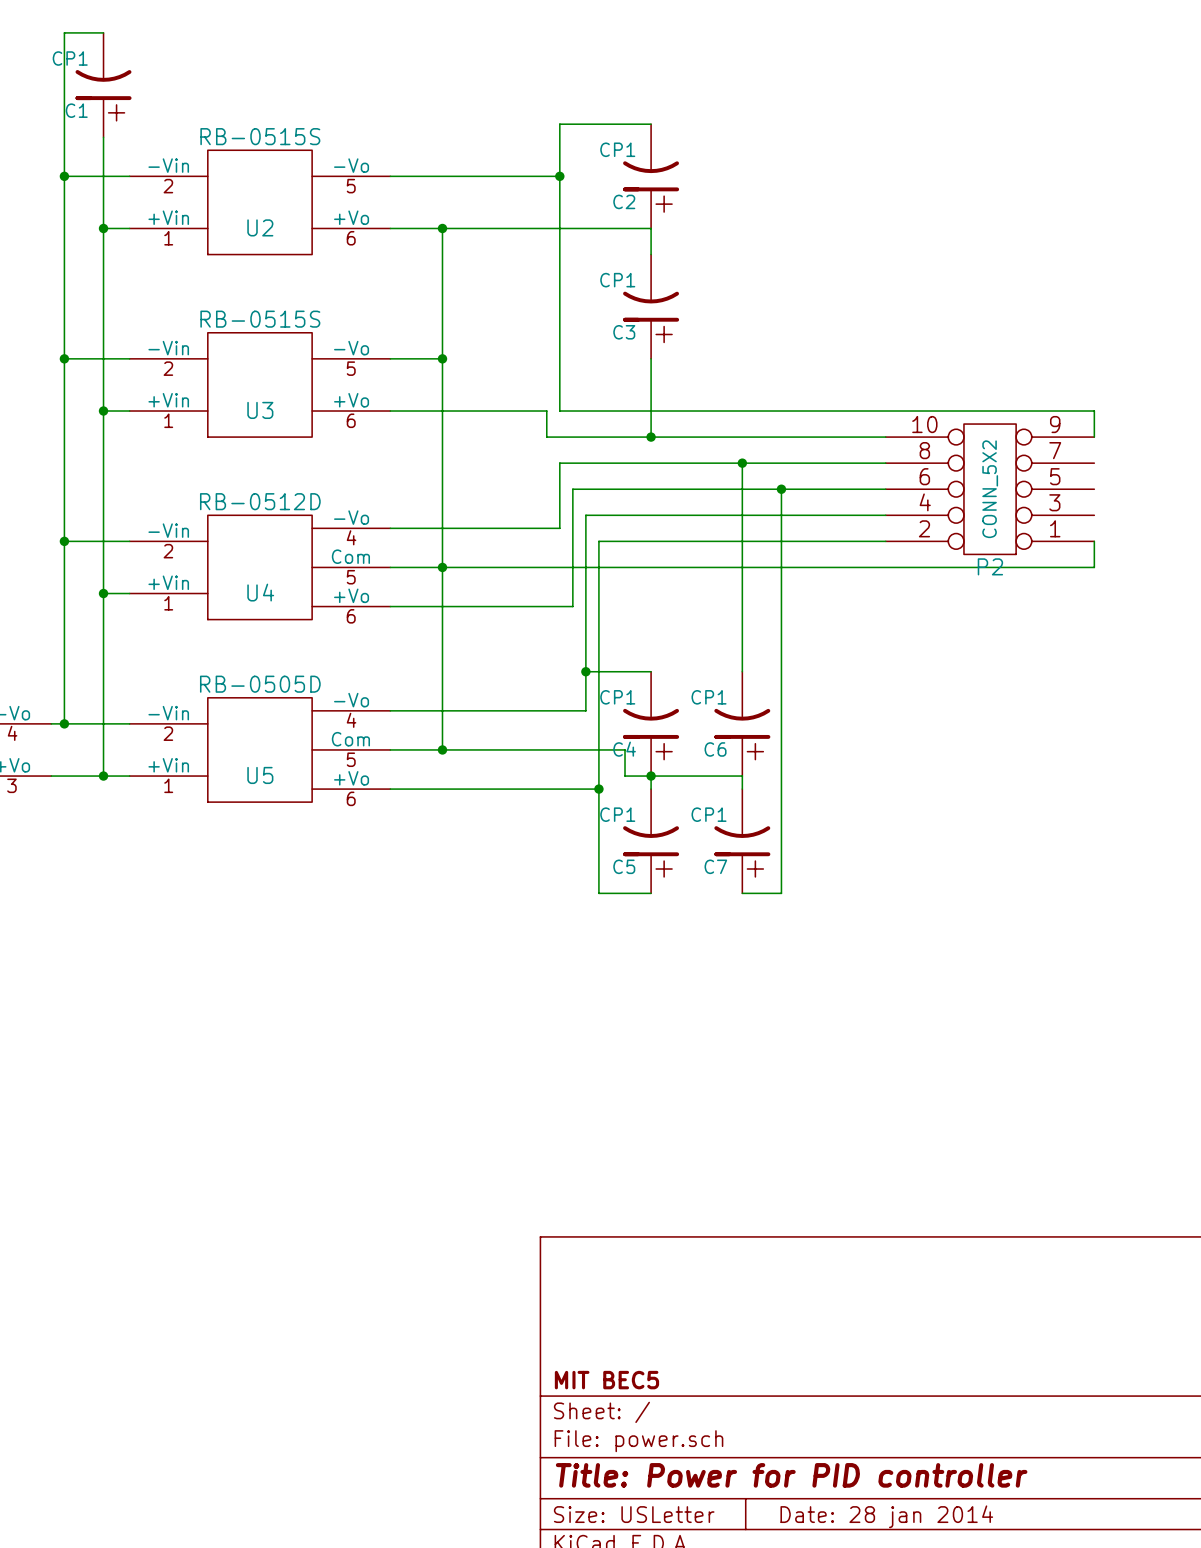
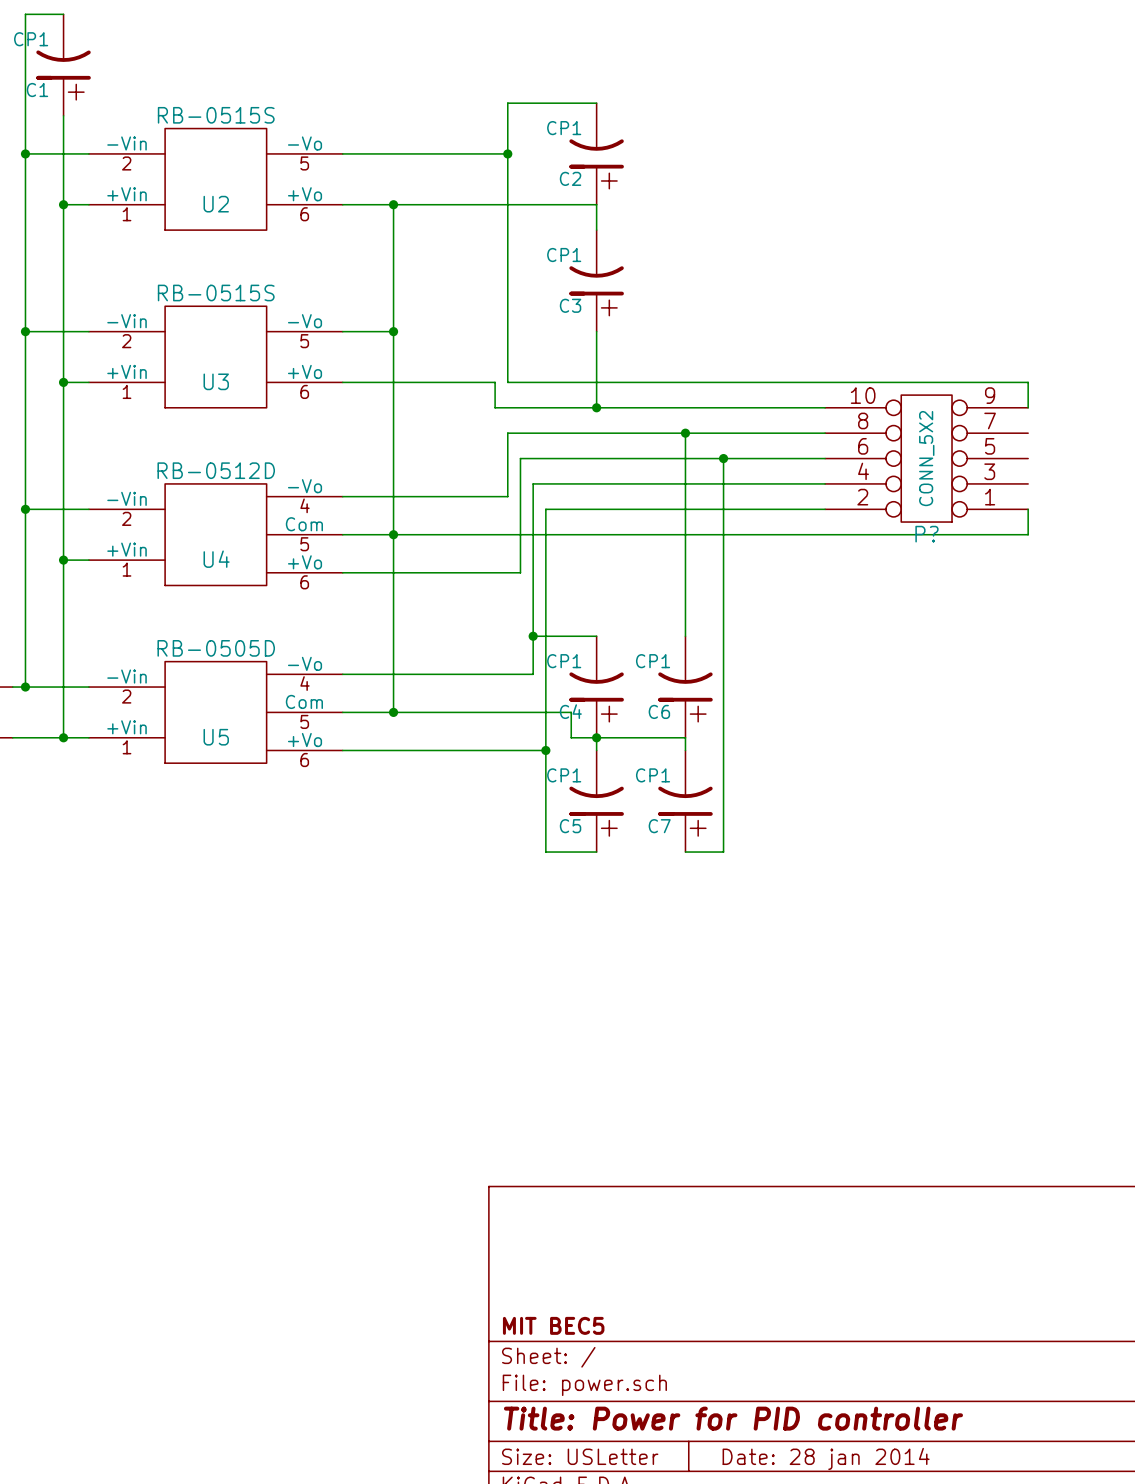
P2 name: P2 (990, 566) -> P? (926, 534)

